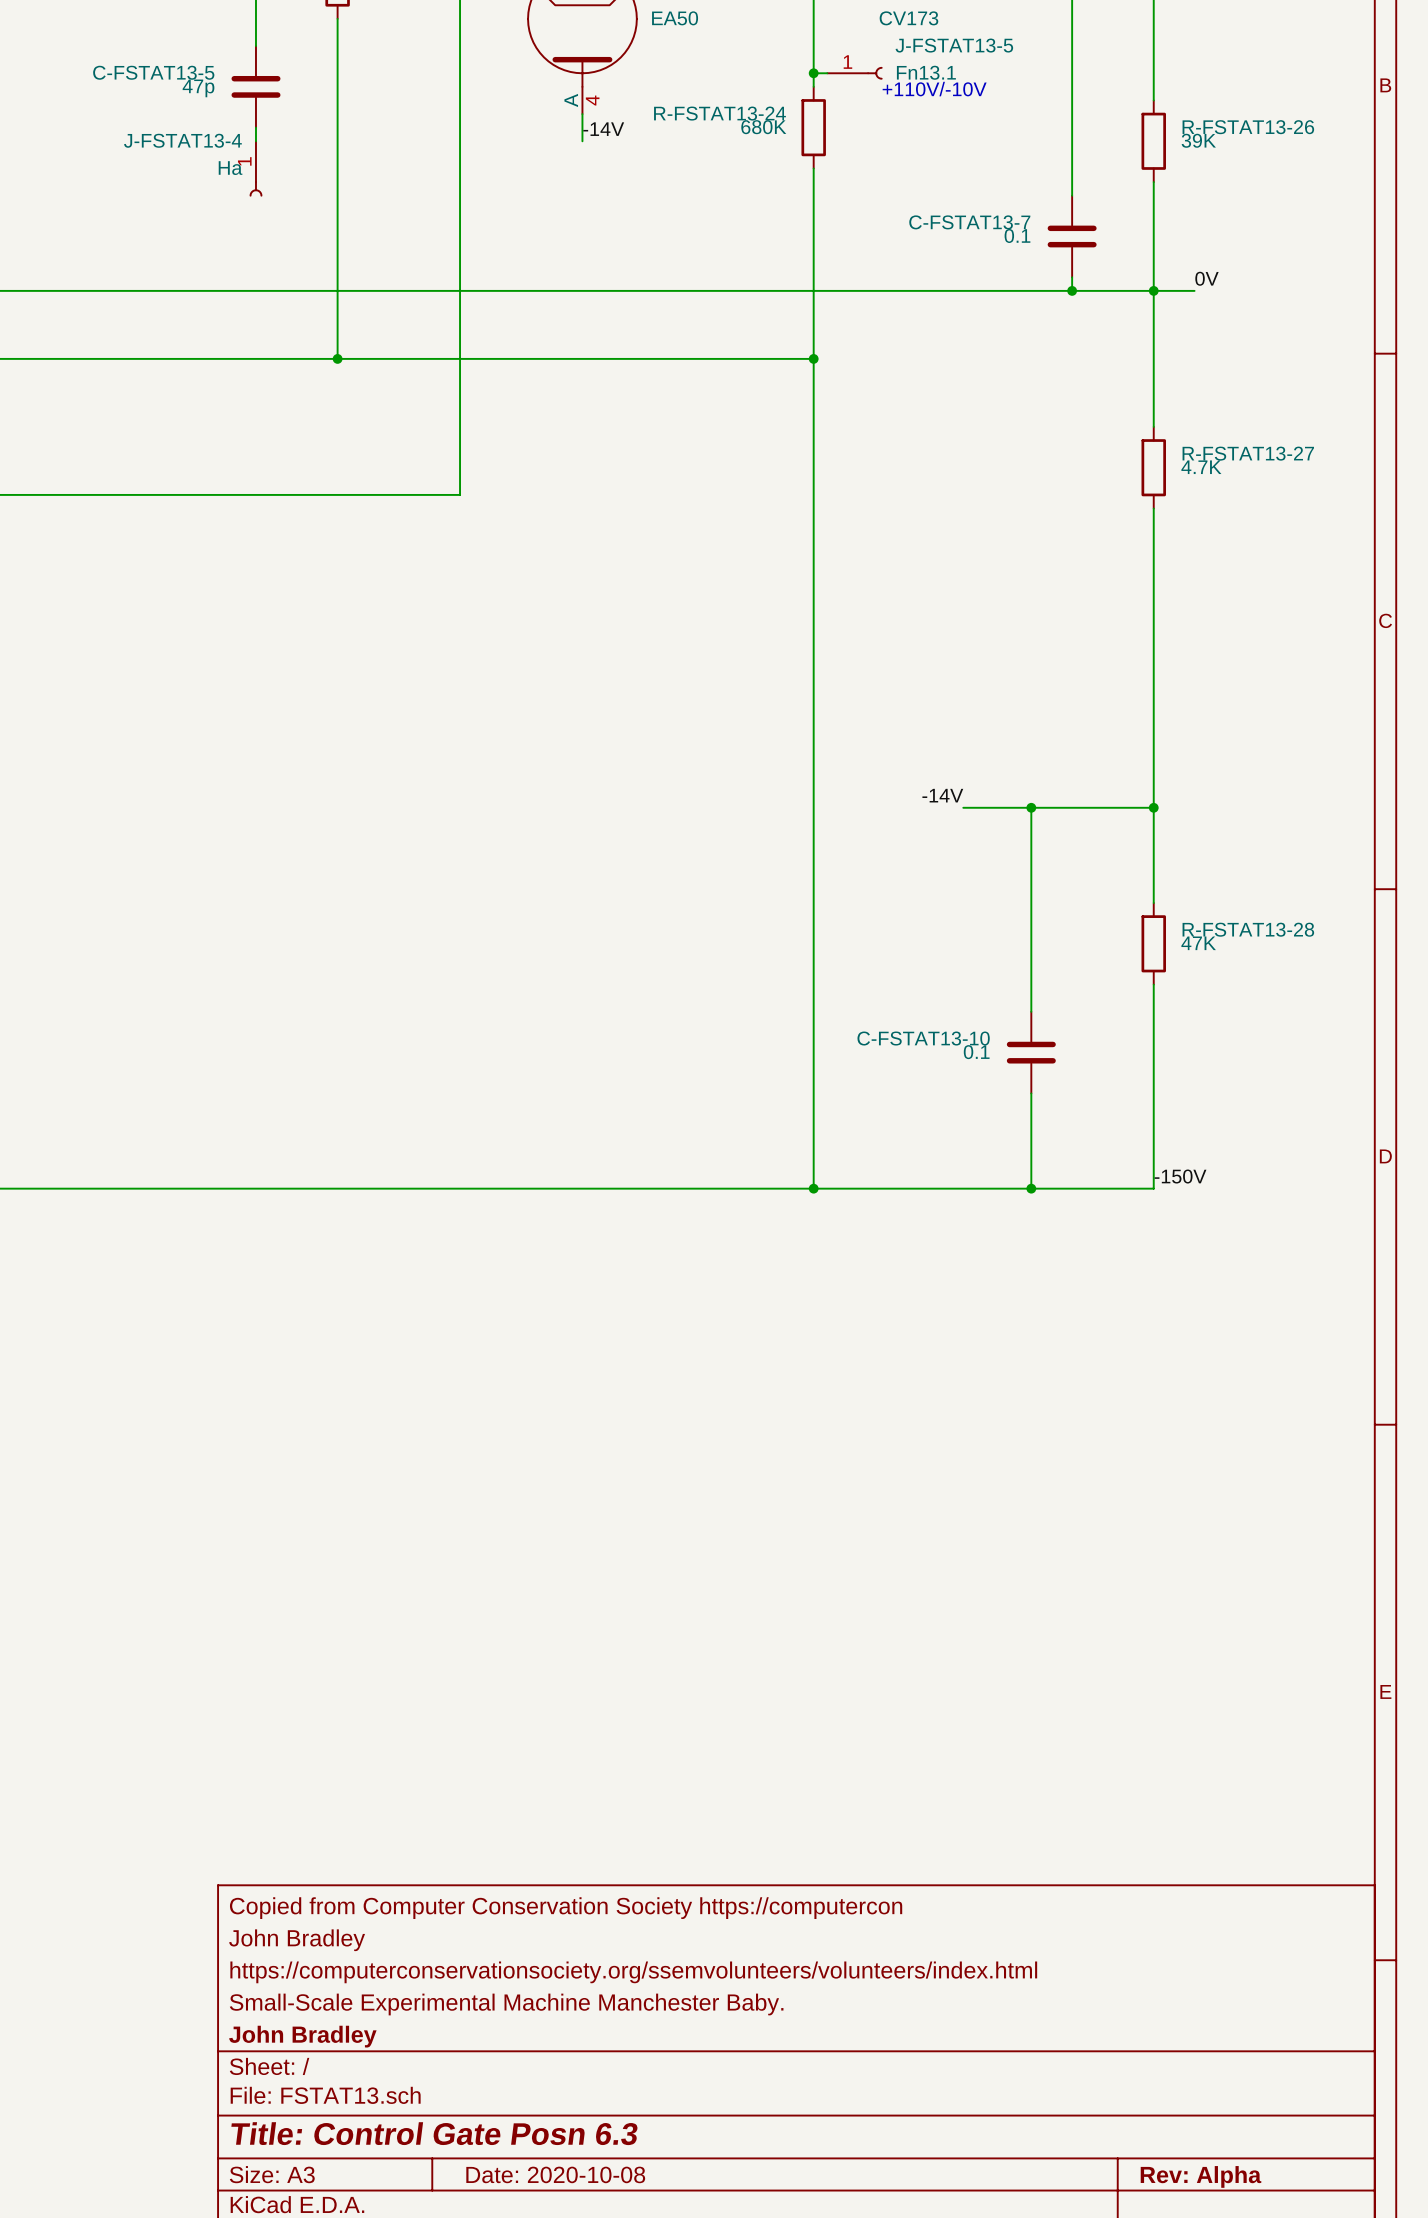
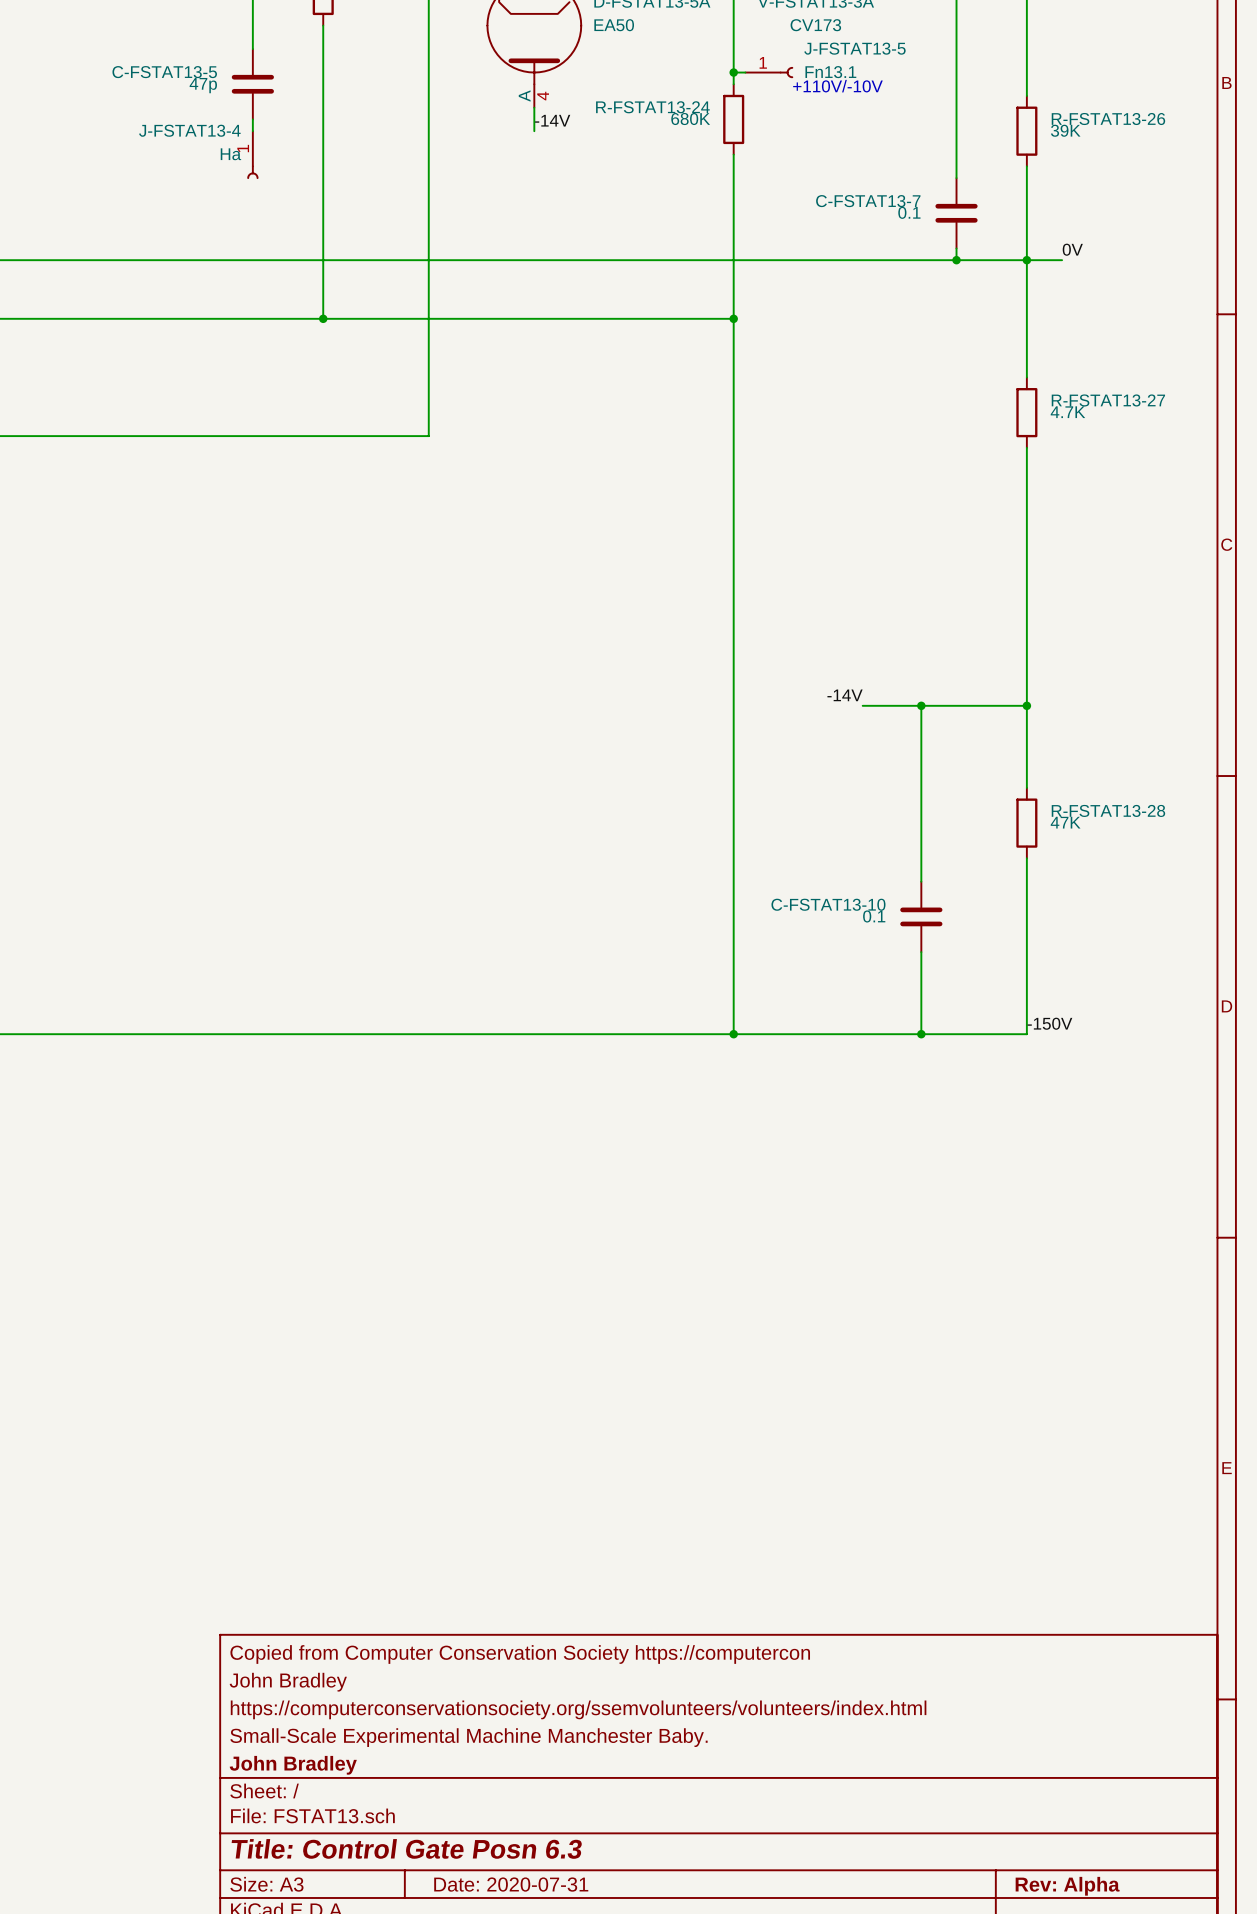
title block: Date: 2020-10-08 (555, 2174) -> Date: 2020-07-31 (511, 1884)

